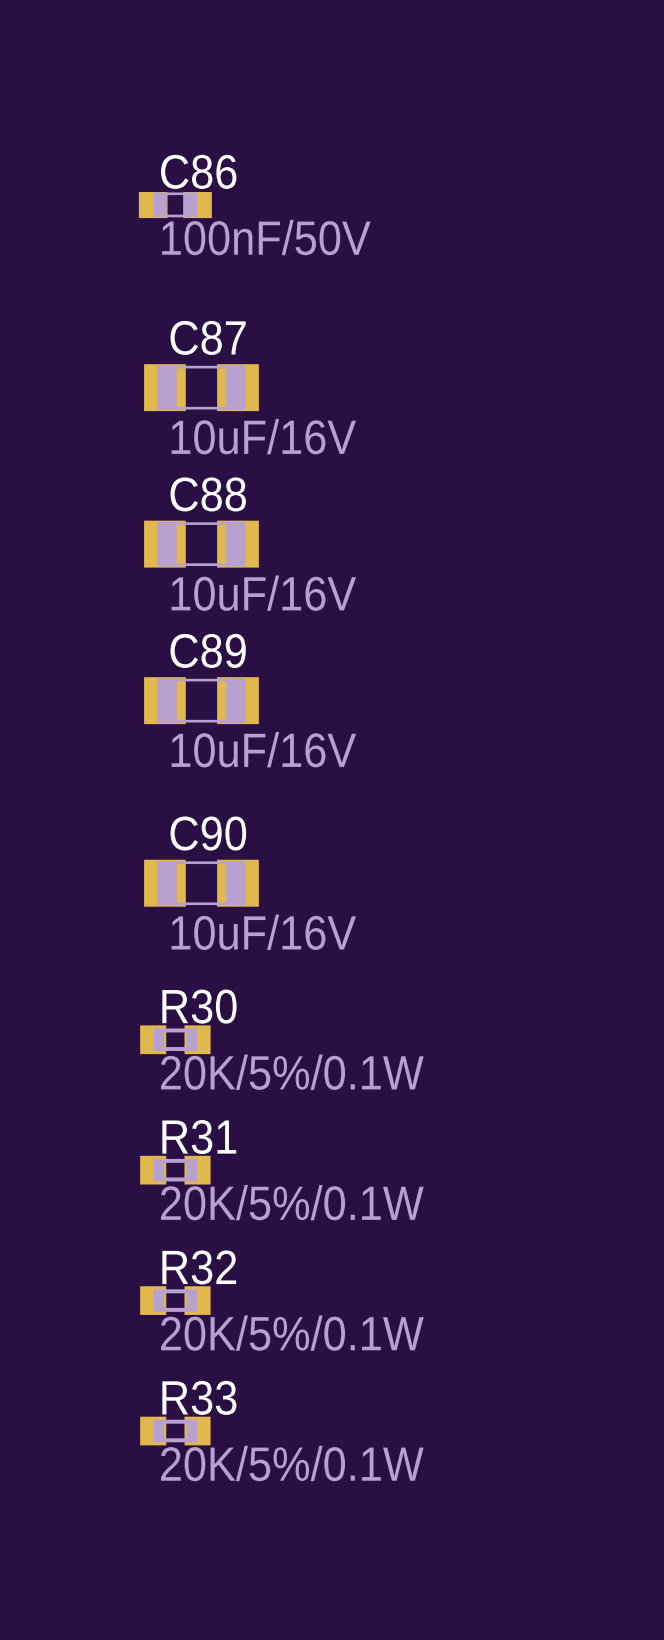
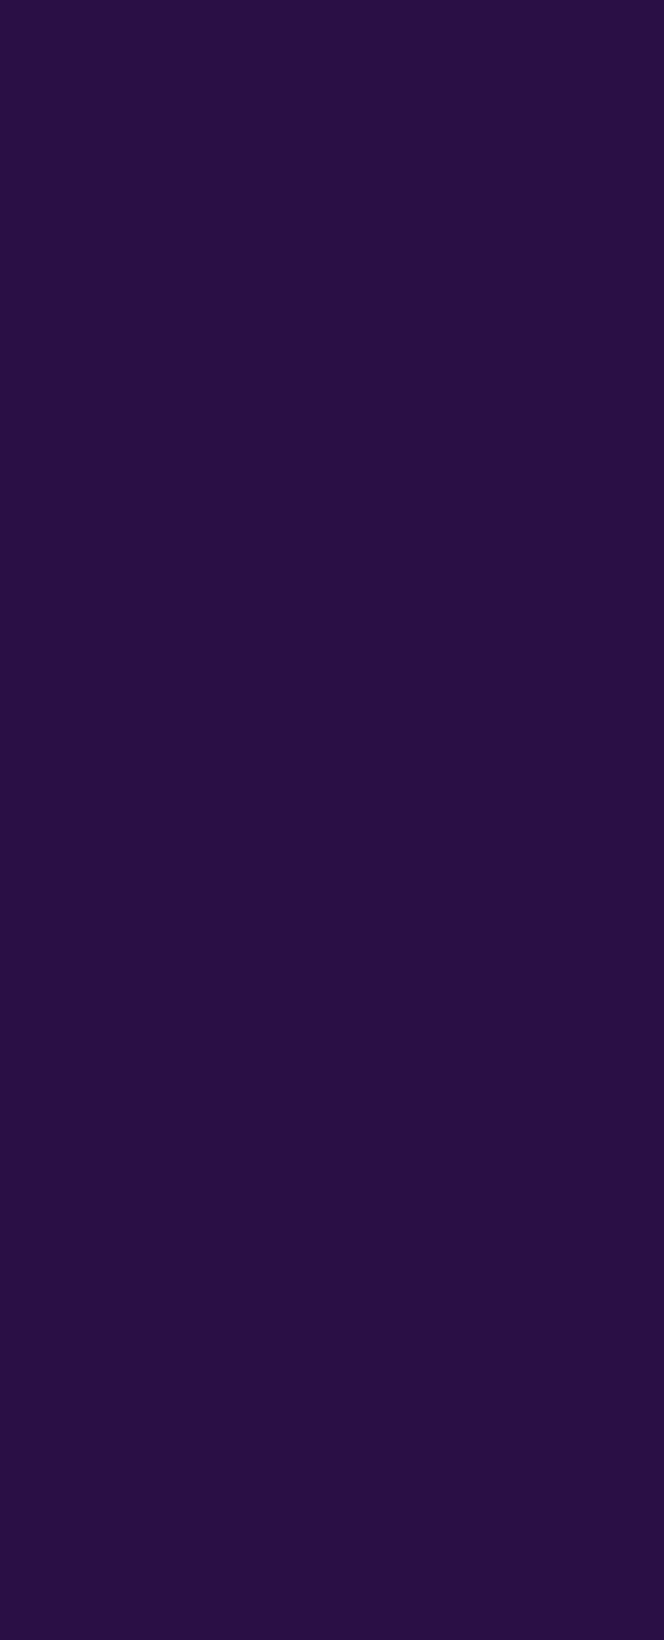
C86: 100nF/50V (175, 205) -> none
C87: 10uF/16V (201, 387) -> none
C88: 10uF/16V (201, 544) -> none
C89: 10uF/16V (201, 700) -> none
C90: 10uF/16V (201, 883) -> none
R30: 20K/5%/0.1W (175, 1039) -> none
R31: 20K/5%/0.1W (175, 1170) -> none
R32: 20K/5%/0.1W (175, 1300) -> none
R33: 20K/5%/0.1W (175, 1431) -> none

